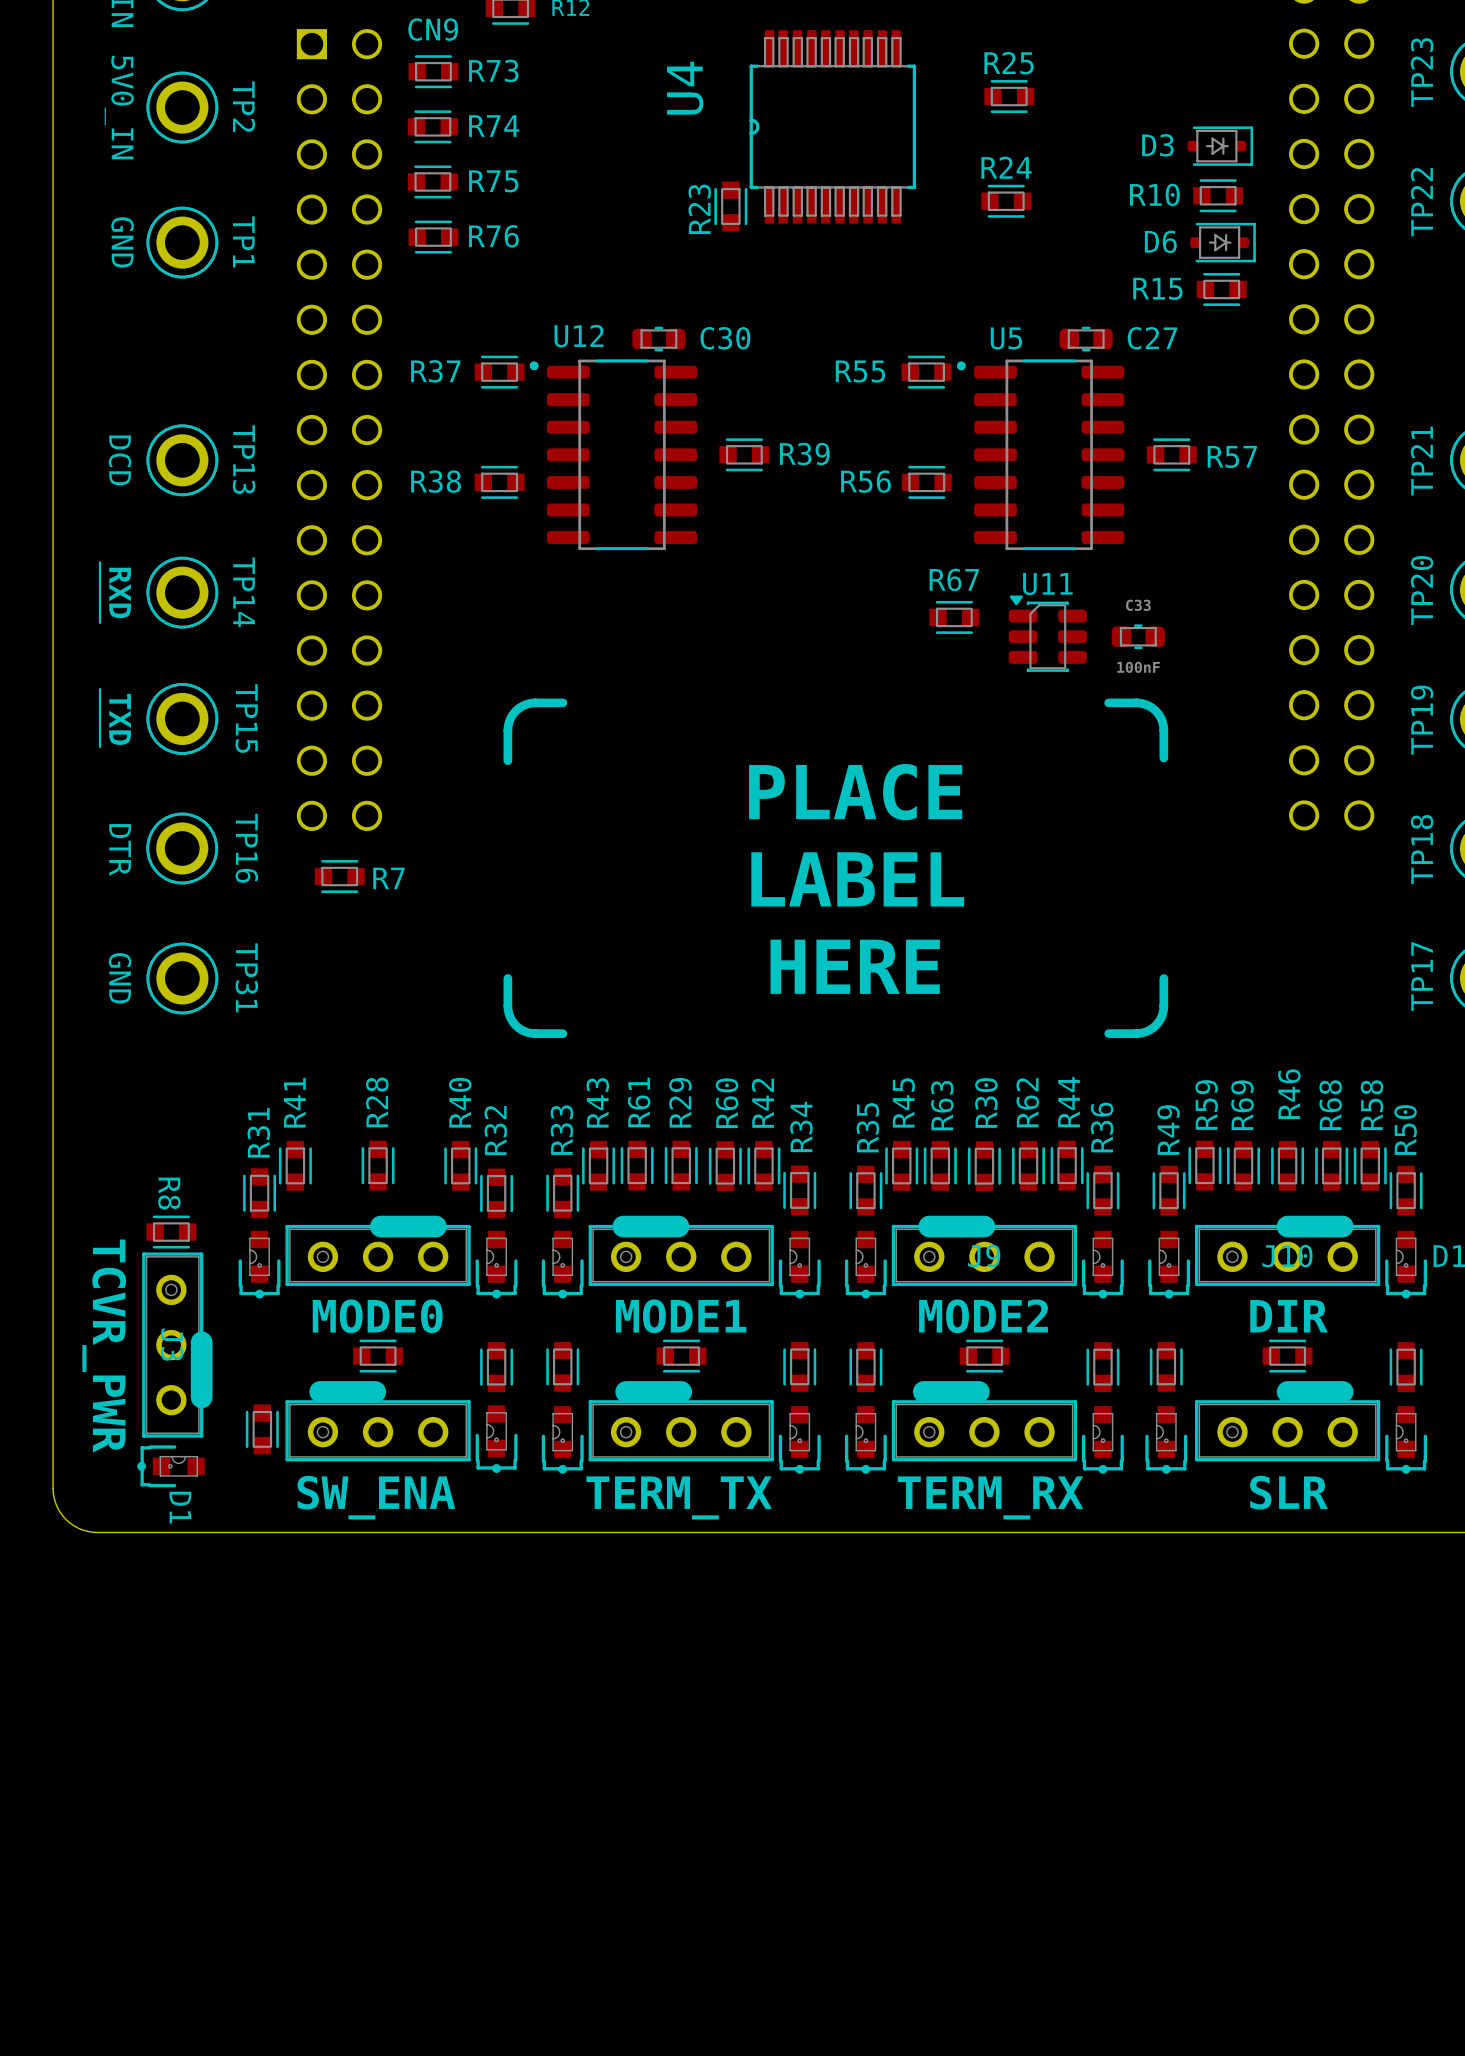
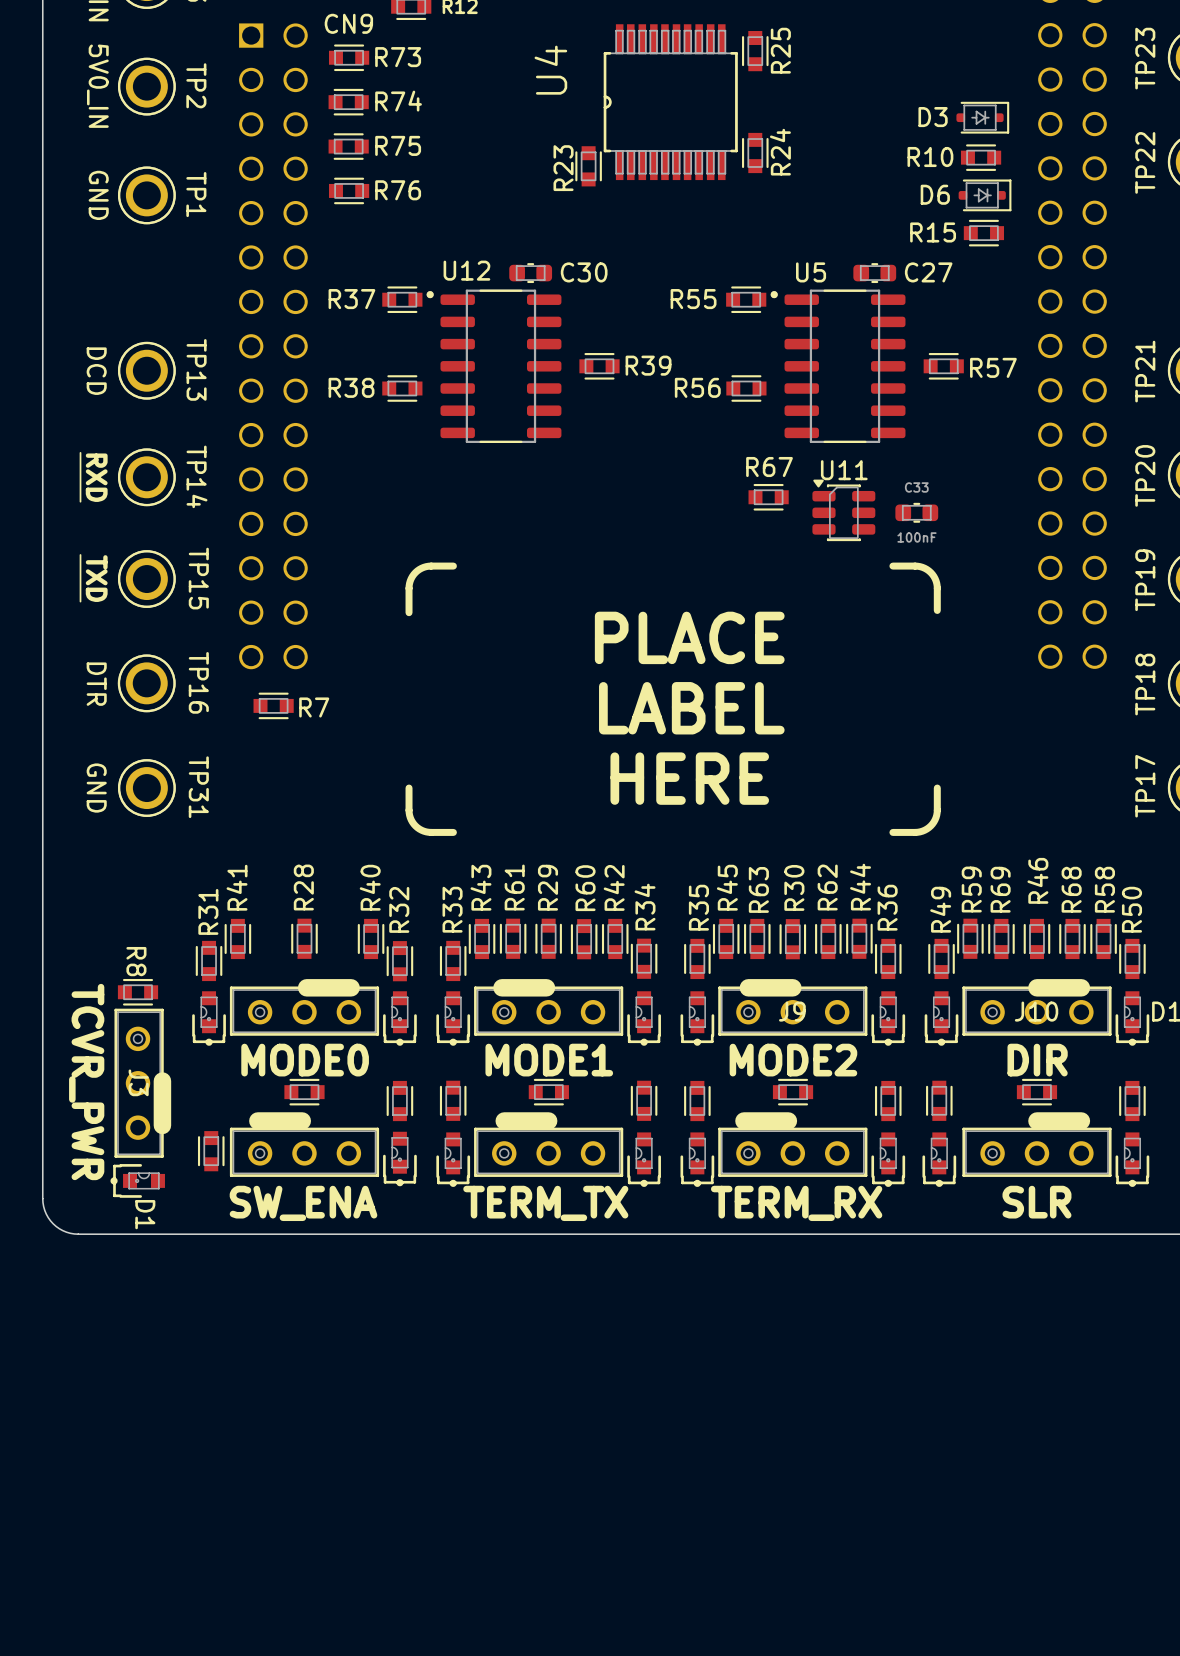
R25 rotation: 0° (1009, 96) -> 90° clockwise (755, 51)
R25 position: (1009, 96) -> (755, 51)
R24 rotation: 0° (1006, 201) -> 90° clockwise (755, 153)
R24 position: (1006, 201) -> (755, 153)

